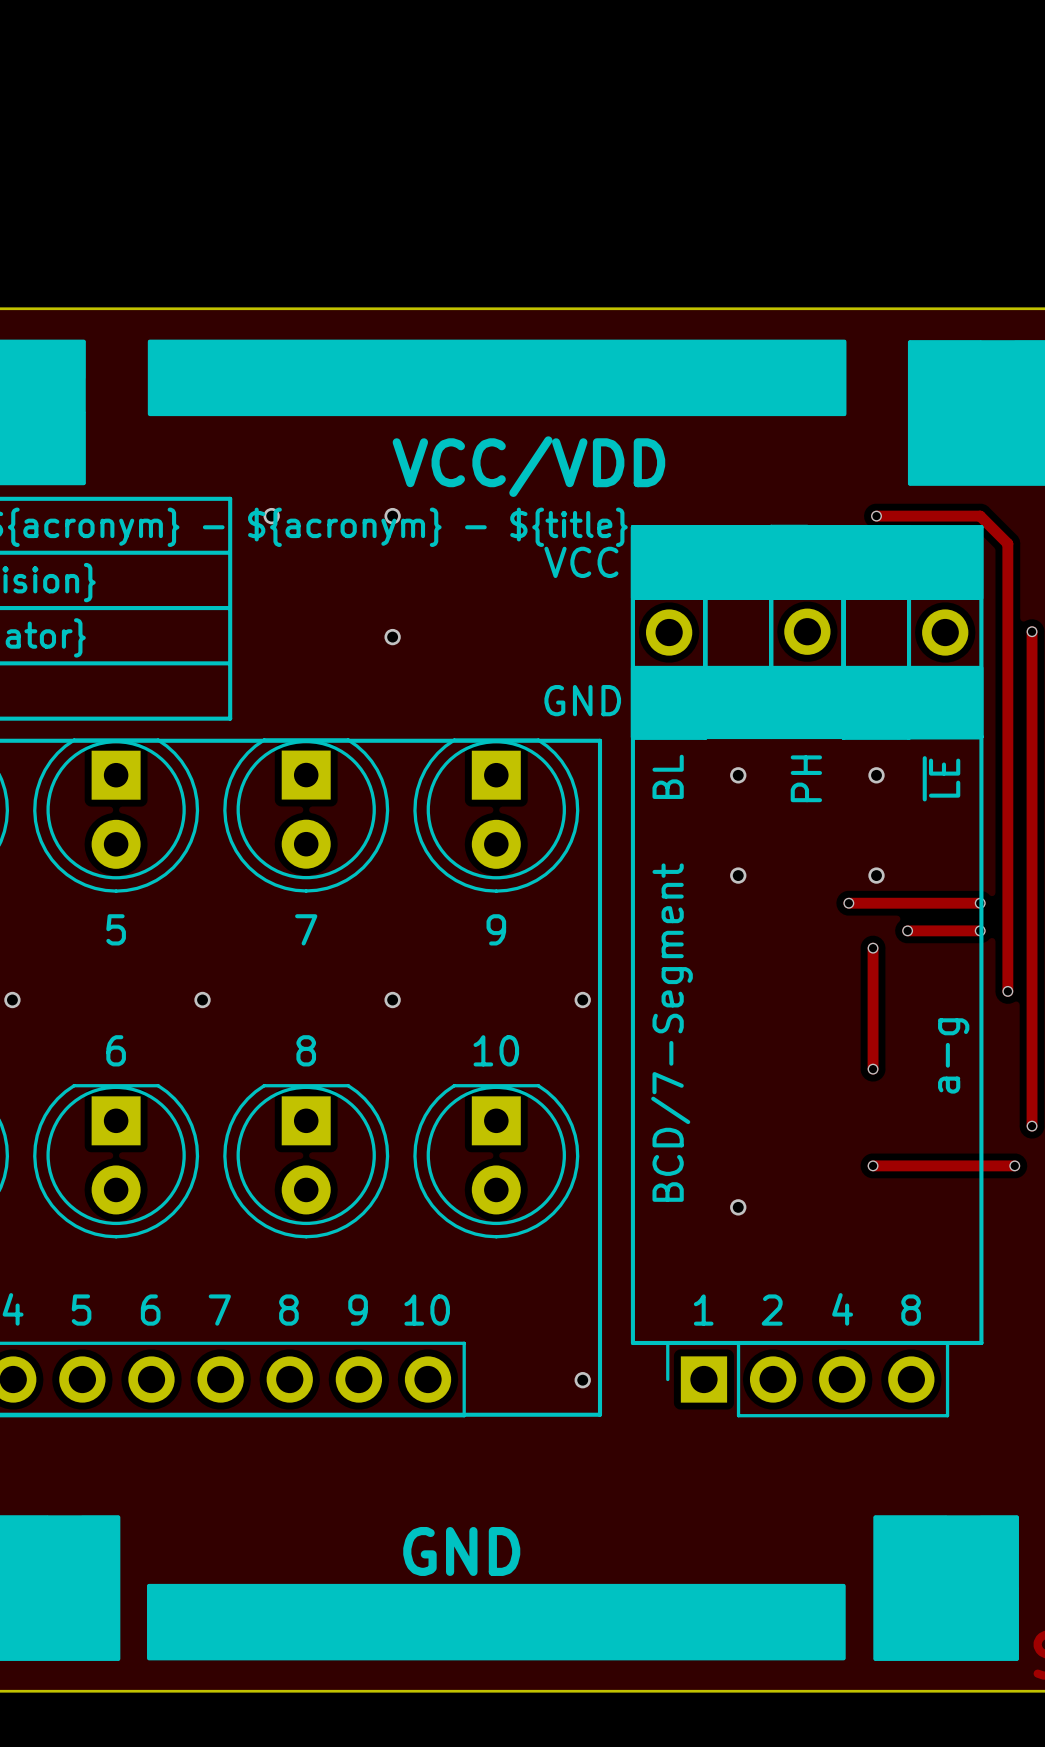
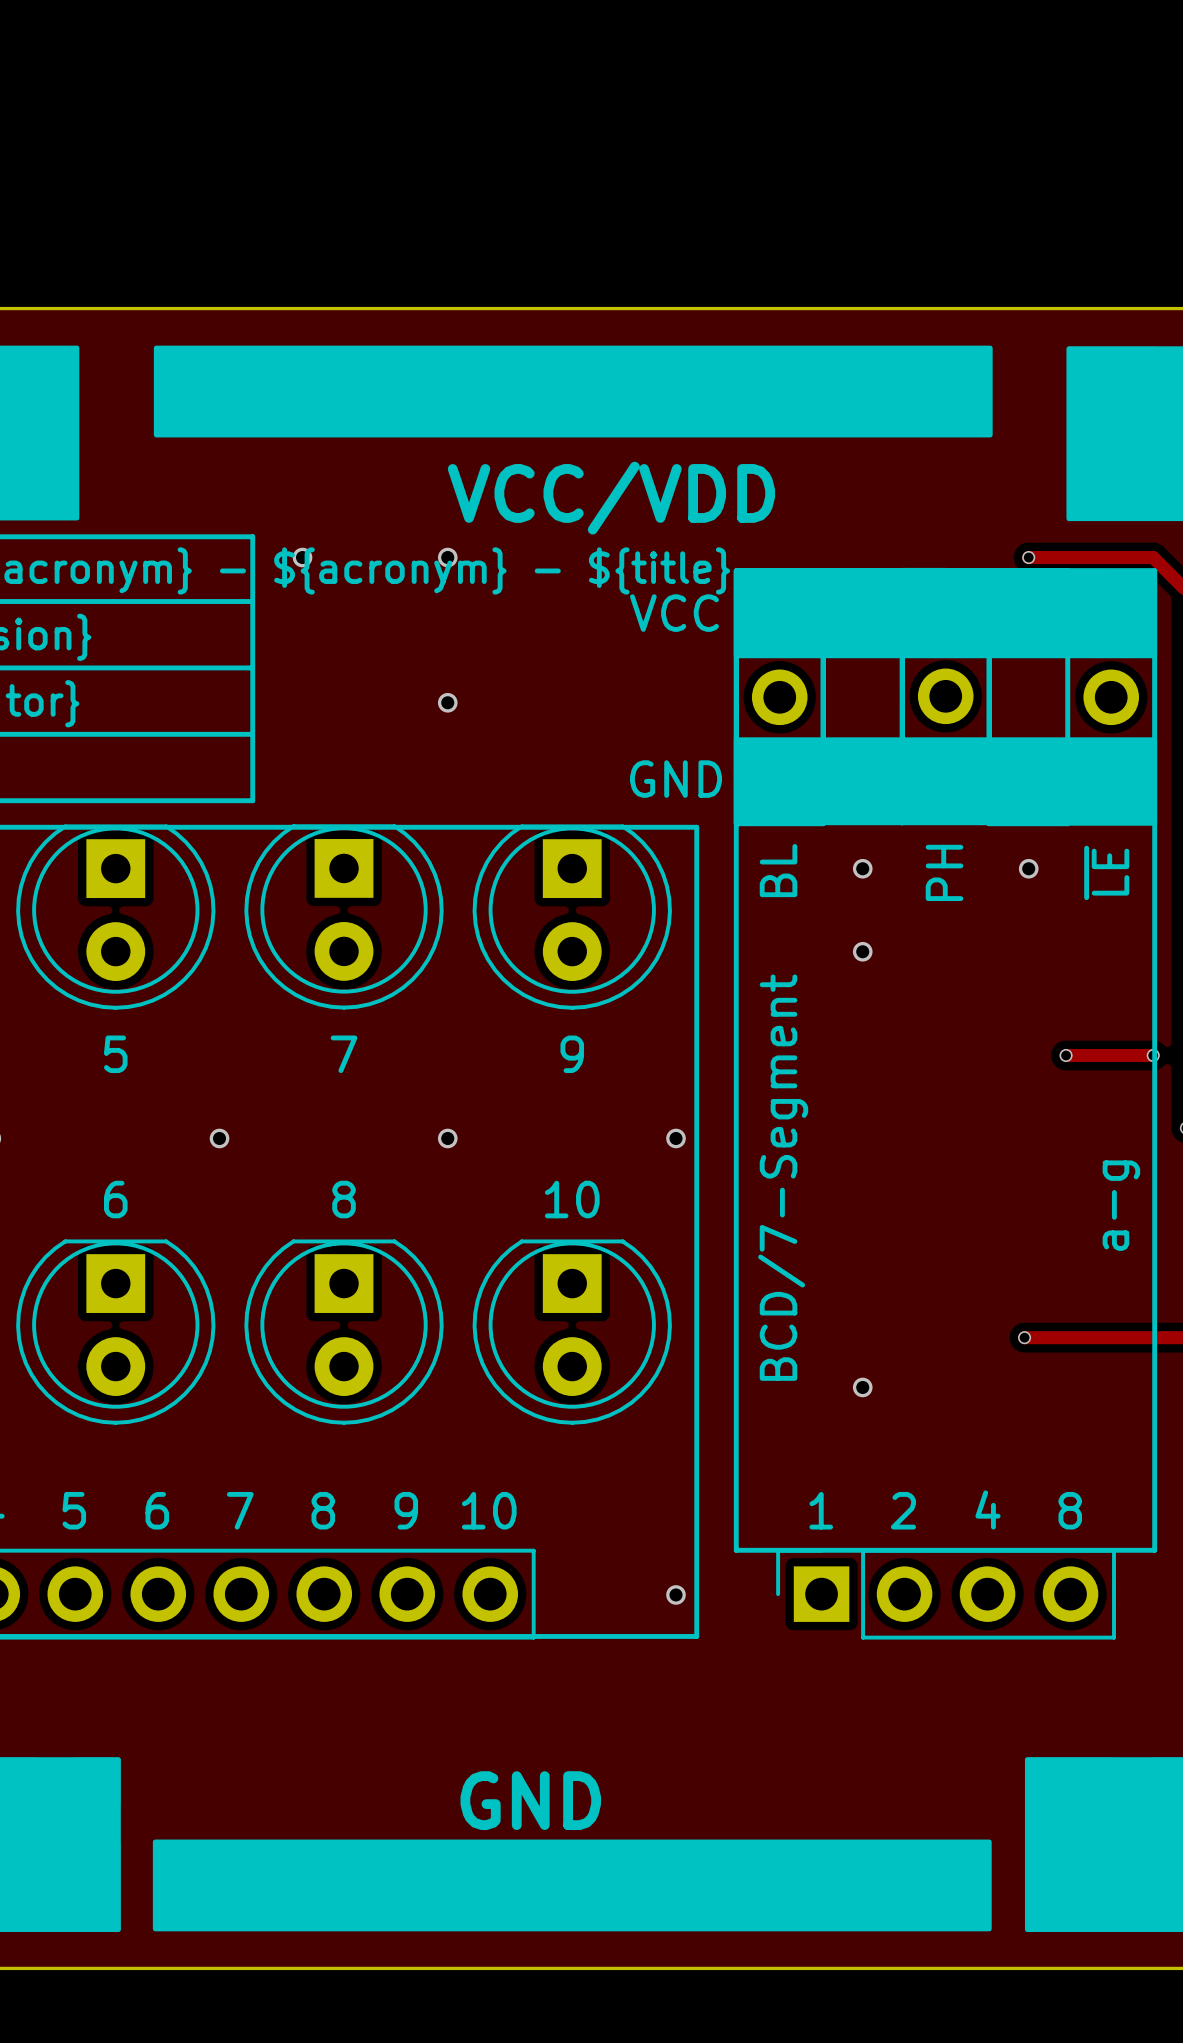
via position: (738, 875) -> (862, 951)
via: (876, 875) -> none
track: (848, 903) (980, 903) -> none
via: (848, 903) -> none
via: (980, 903) -> none
track: (873, 948) (873, 1069) -> none
via: (873, 948) -> none
via: (873, 1069) -> none

